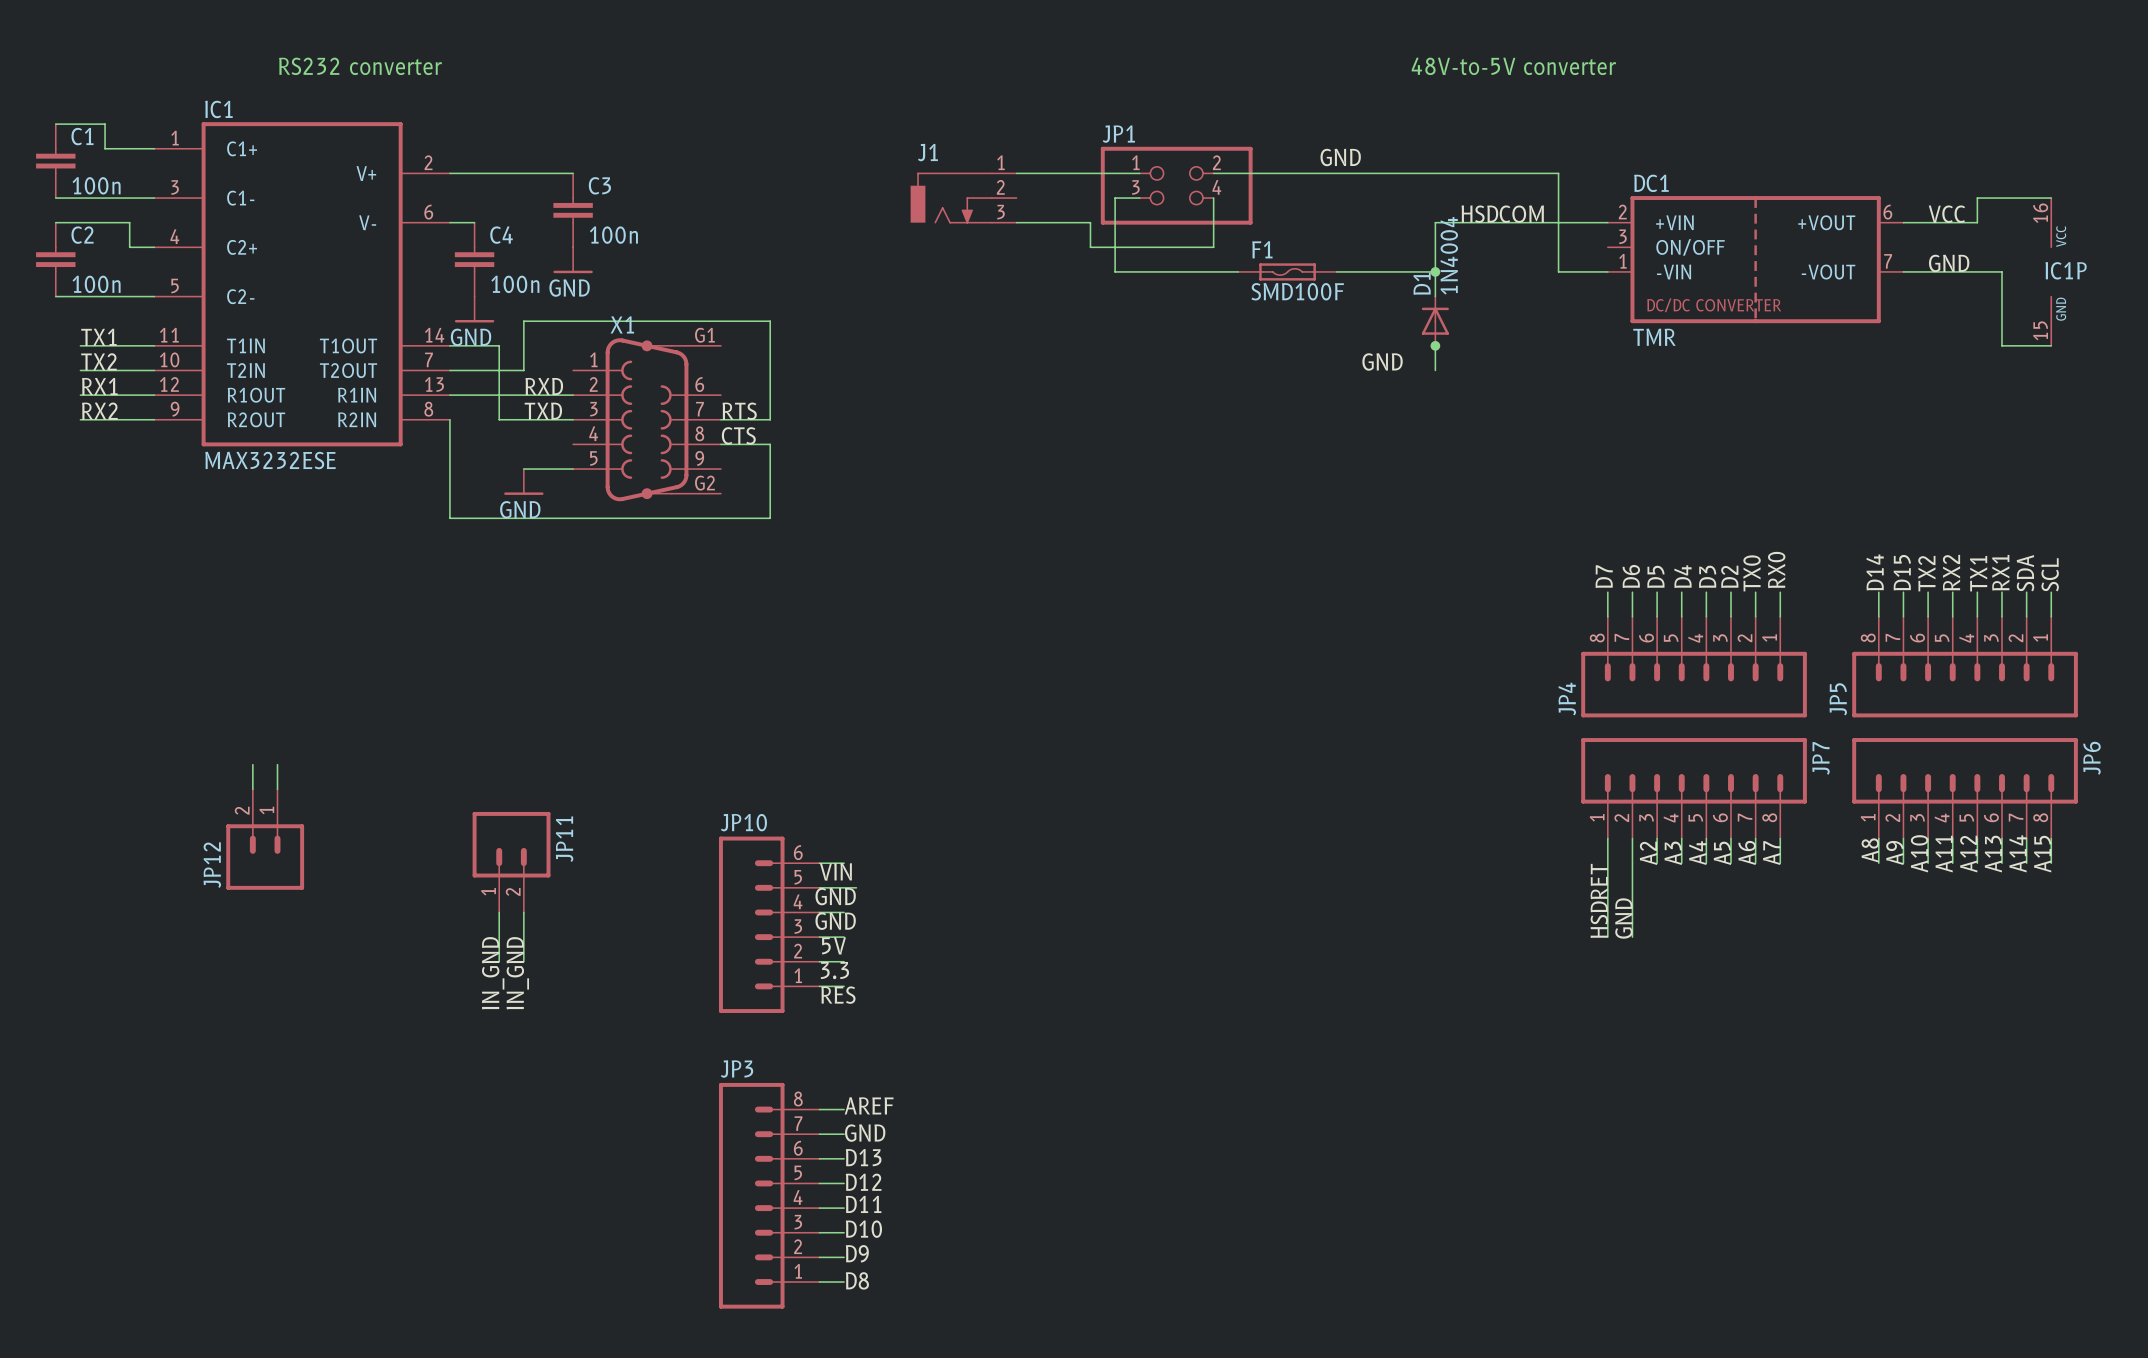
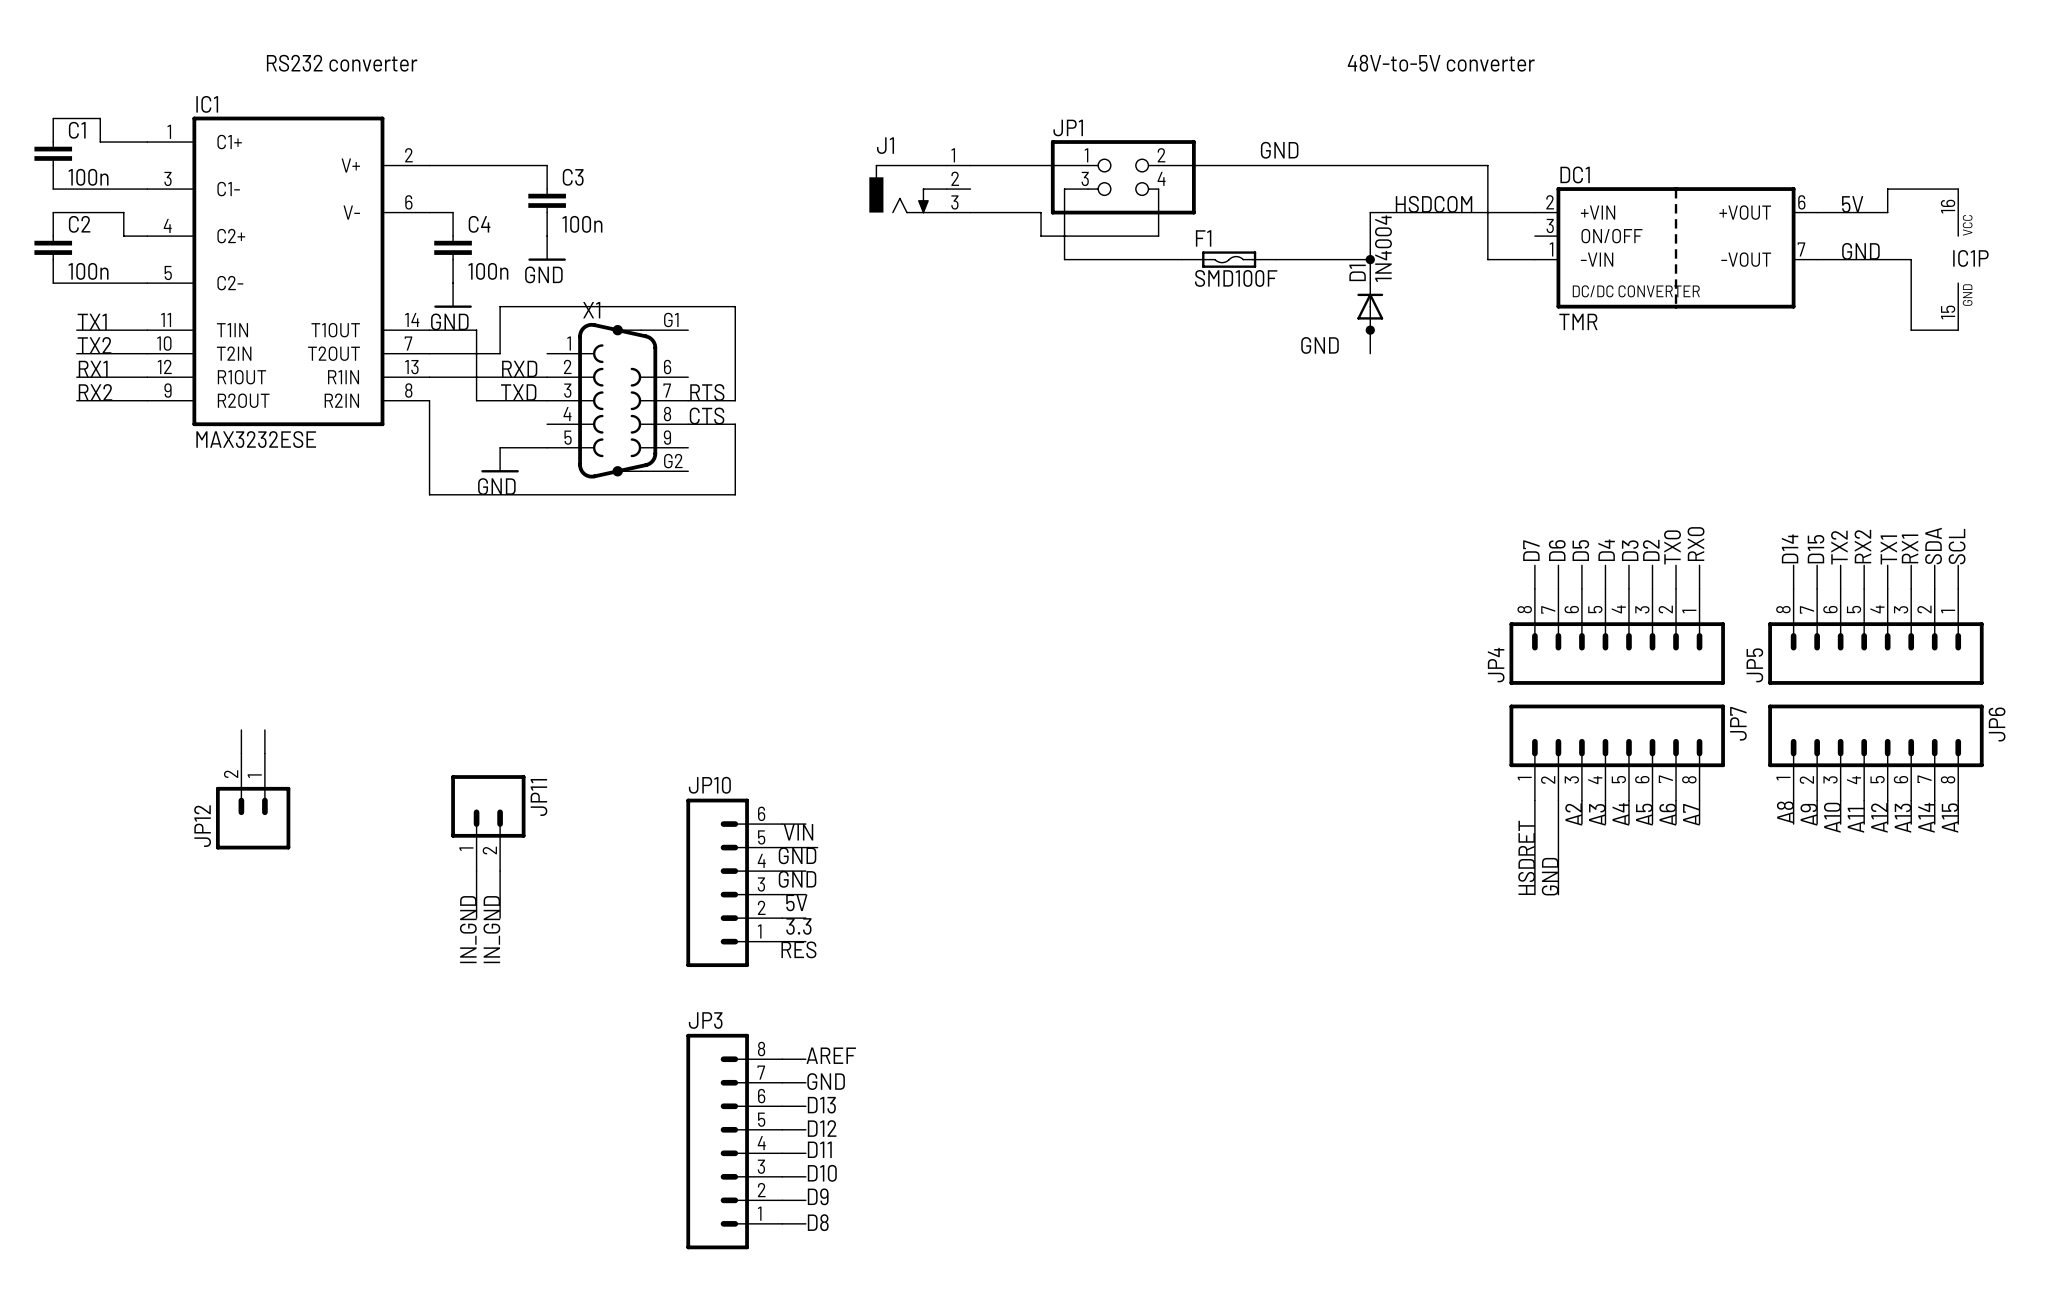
label: VCC (1946, 214) -> 5V (1852, 204)

